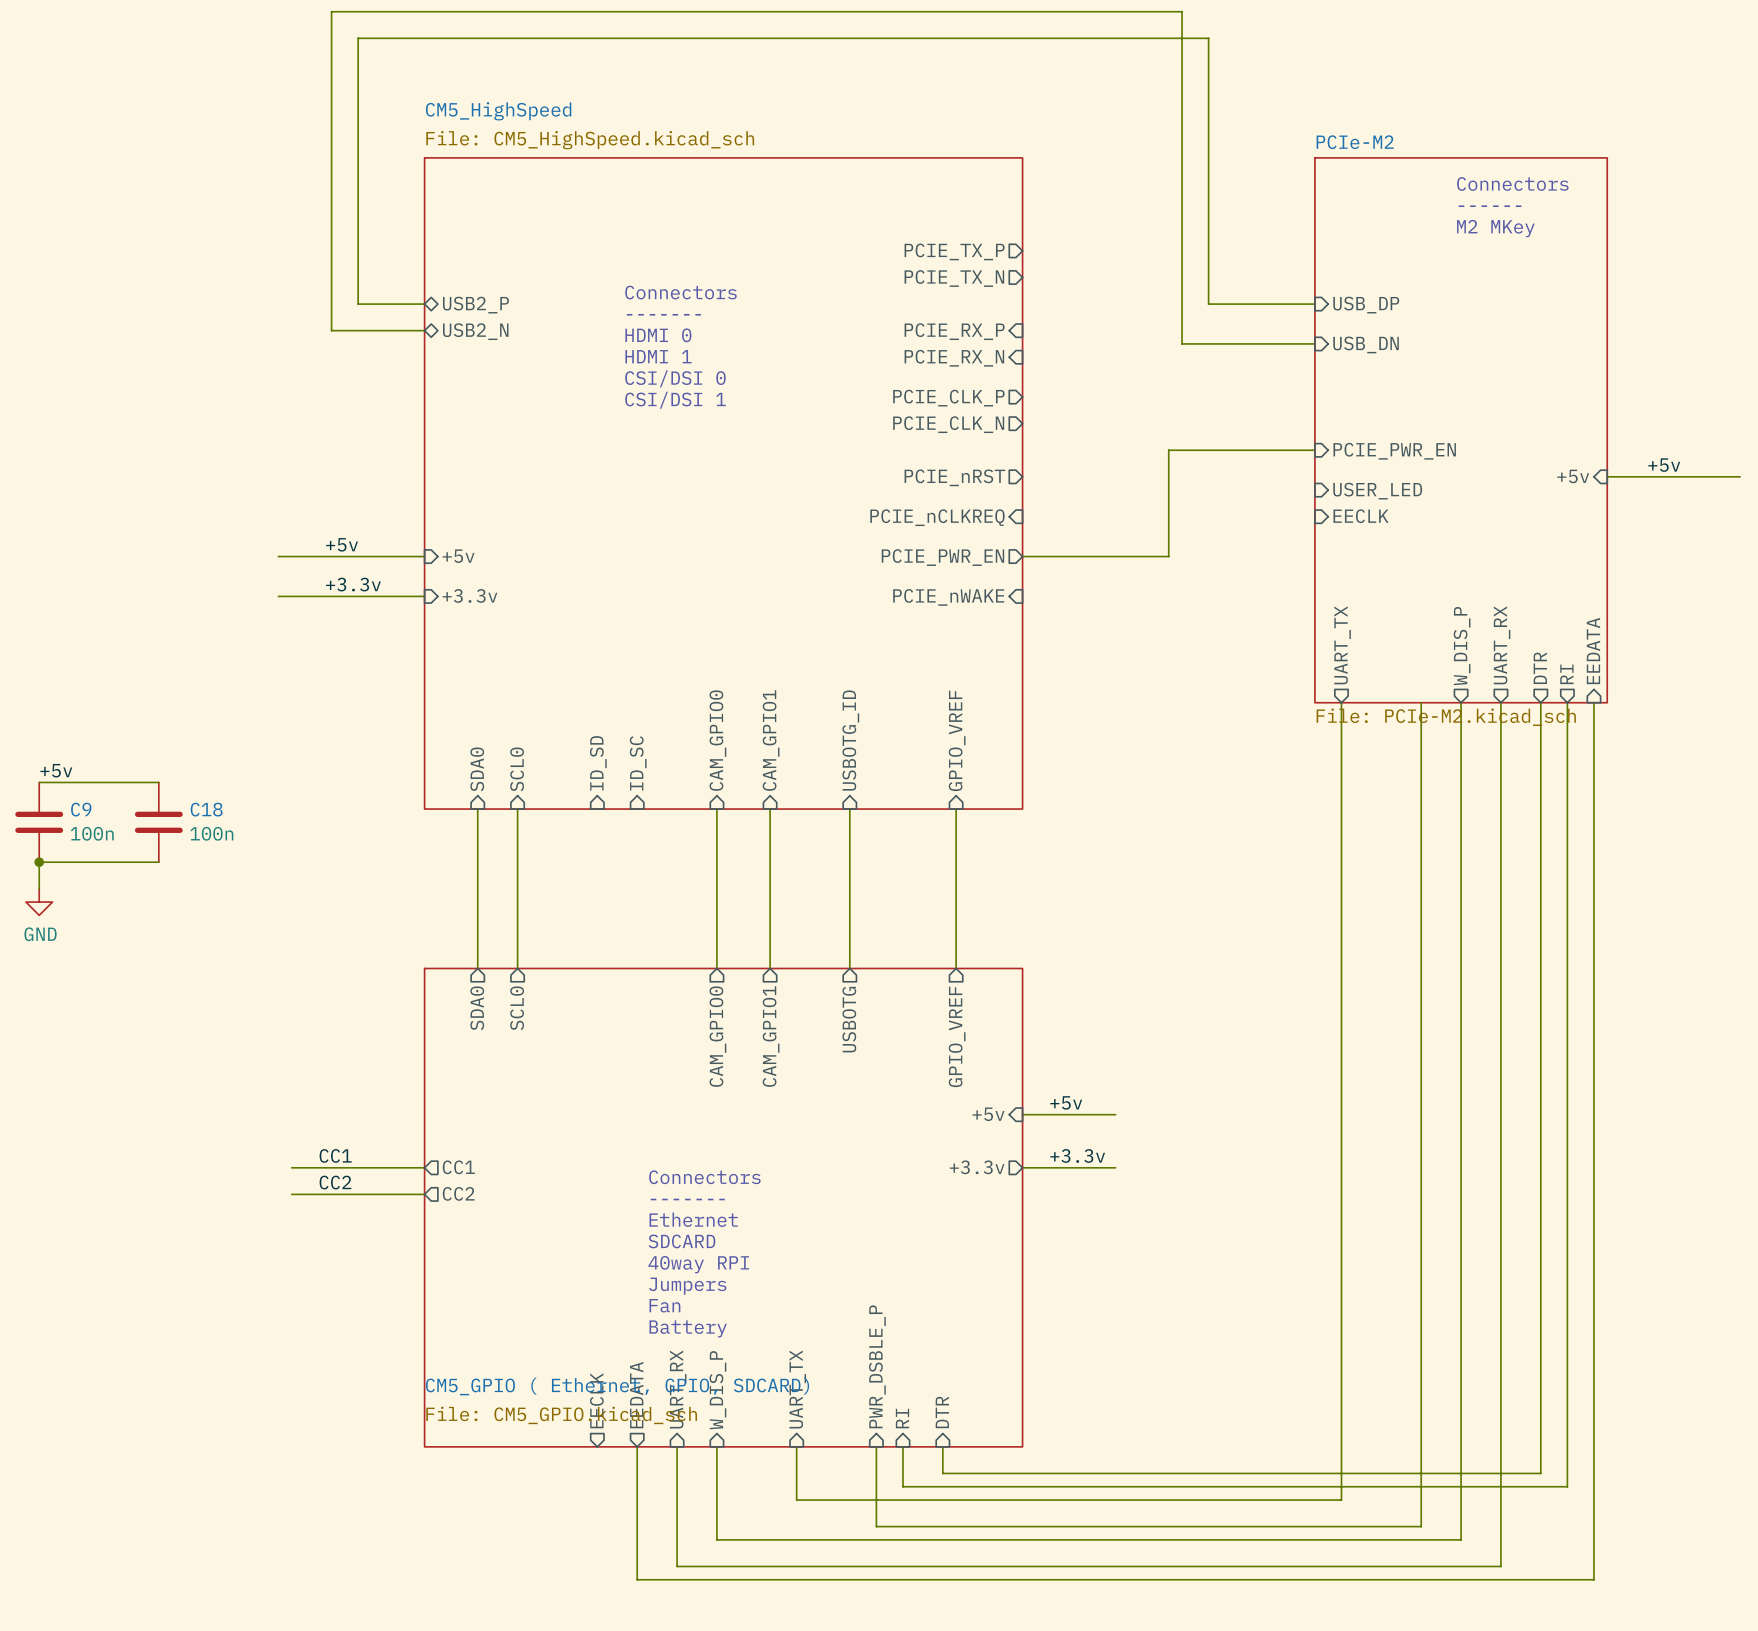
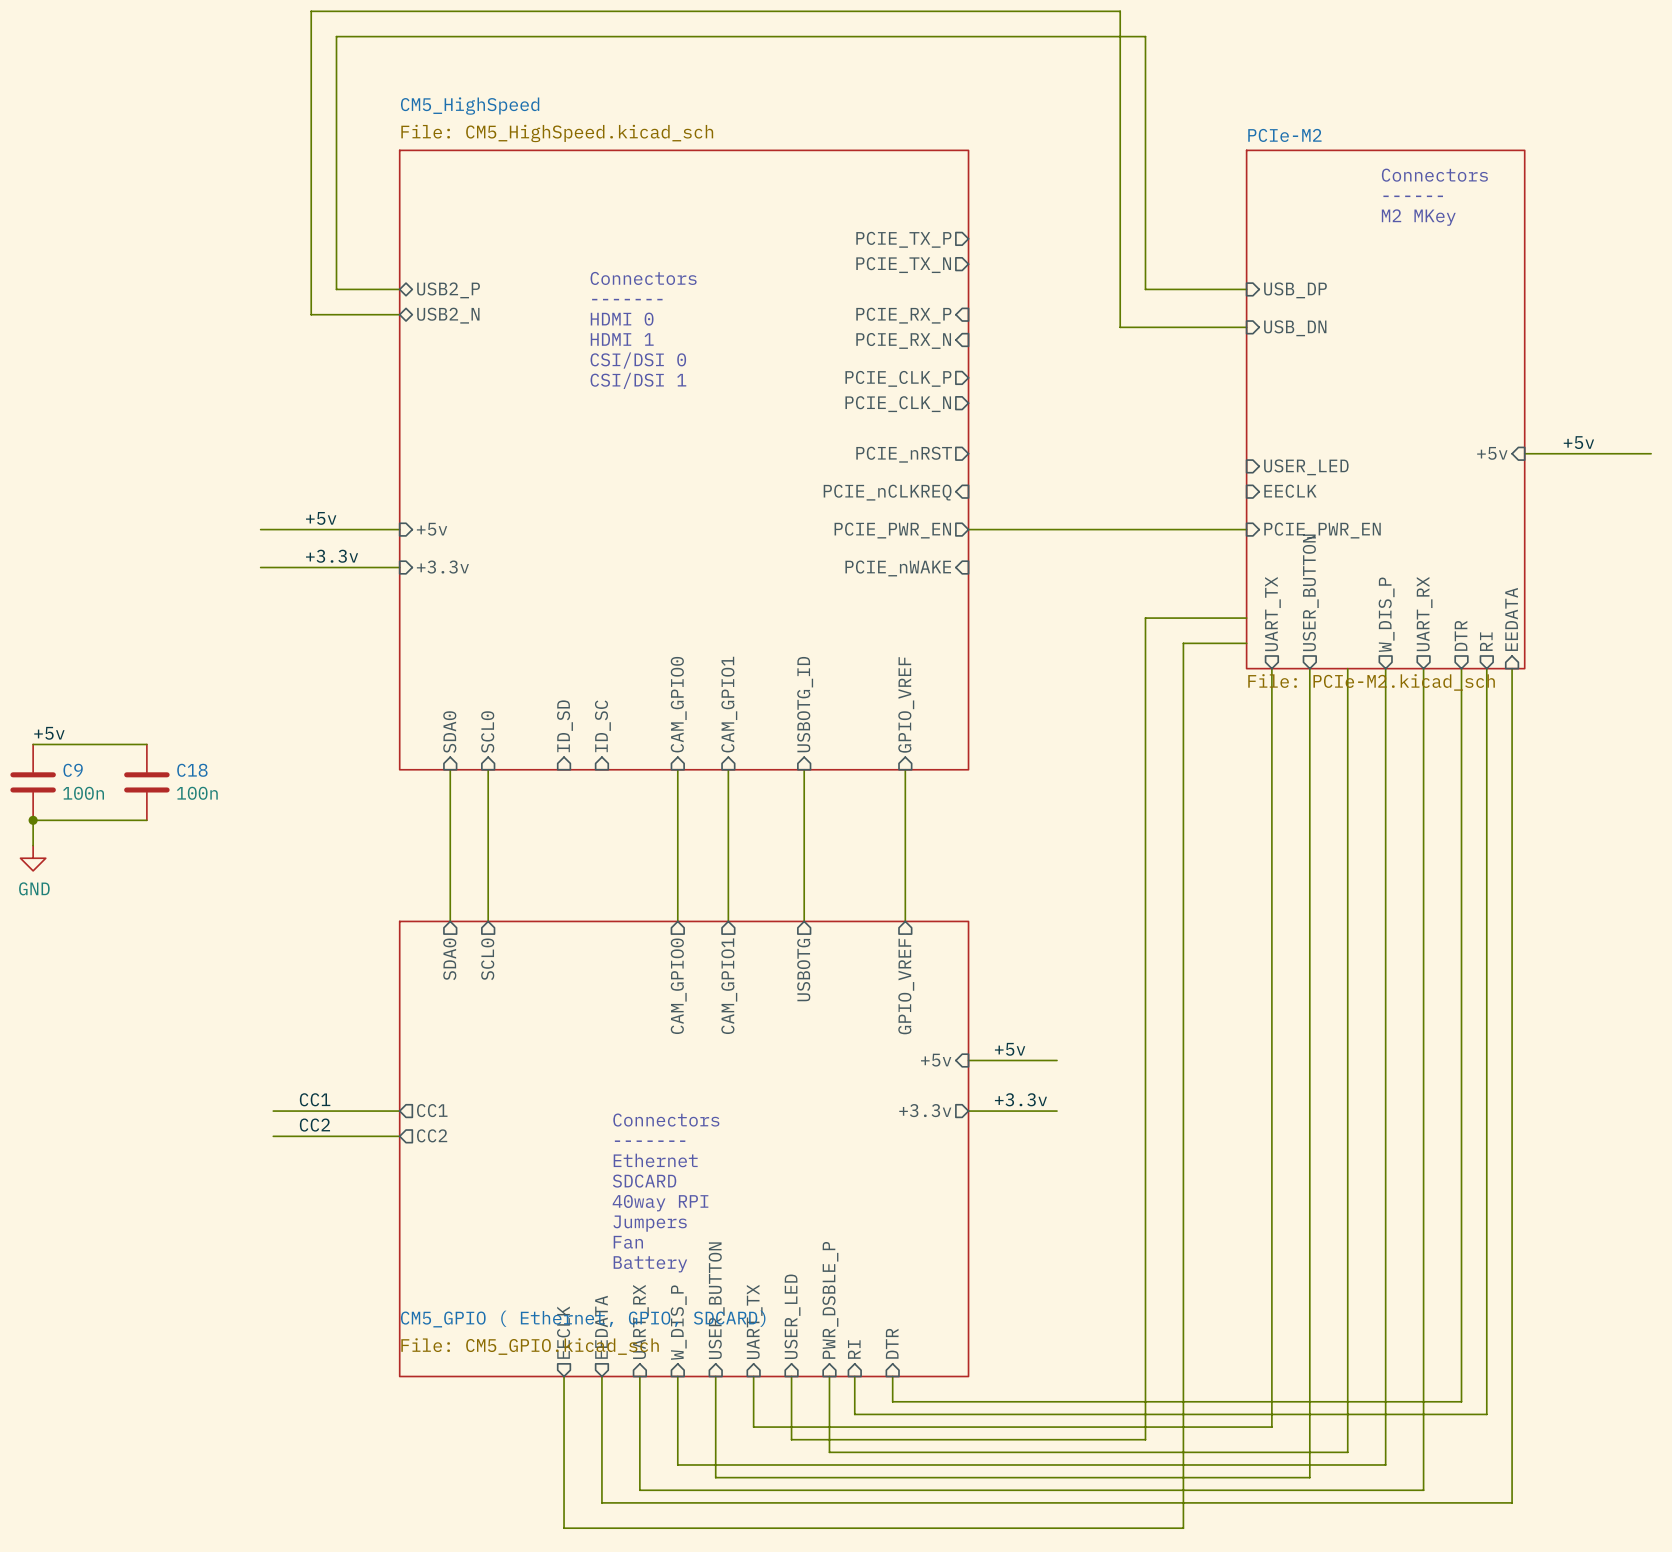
wire: (1314, 450) (1168, 450) (1168, 556) -> (1246, 529) (1107, 529)
sheet pin position: PCIE_PWR_EN (1394, 451) -> PCIE_PWR_EN (1322, 530)
sheet pin: none -> USER_BUTTON (1310, 592)
wire: none -> (1246, 618) (1145, 618) (1145, 1439) (791, 1439) (791, 1376)
wire: none -> (1246, 643) (1183, 643) (1183, 1528) (564, 1528) (564, 1376)
wire: none -> (1309, 668) (1309, 1477) (715, 1477) (715, 1376)
sheet pin: none -> USER_BUTTON (716, 1300)
sheet pin: none -> USER_LED (792, 1316)

